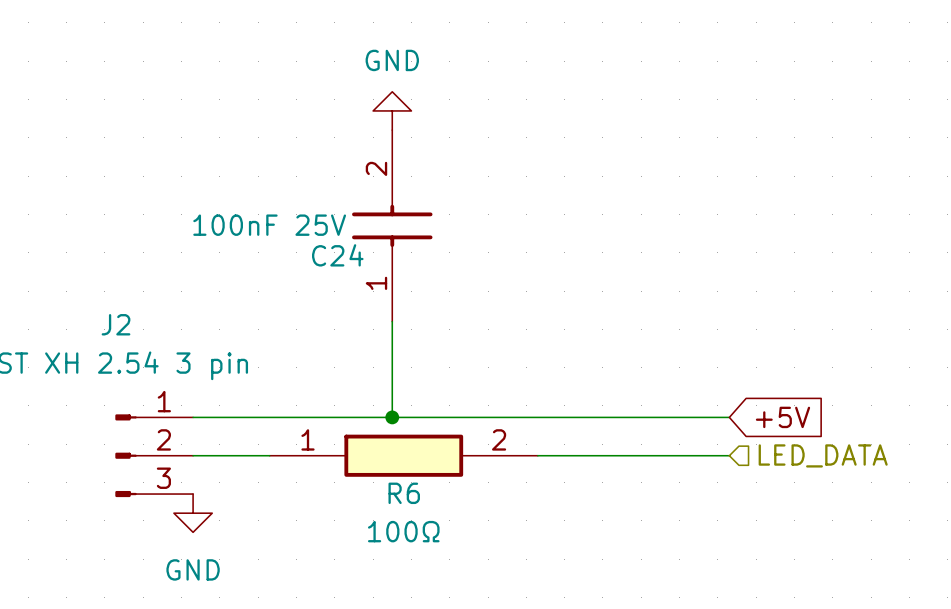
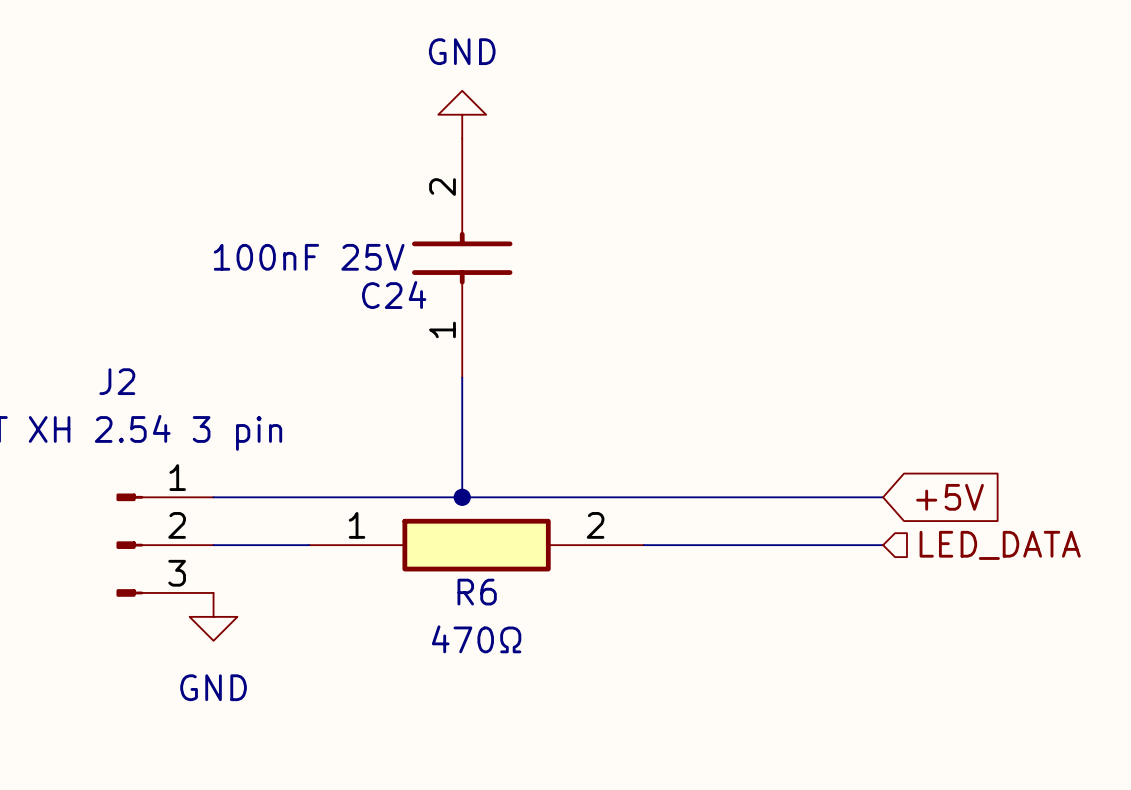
R6 value: 100Ω (403, 531) -> 470Ω (476, 639)

